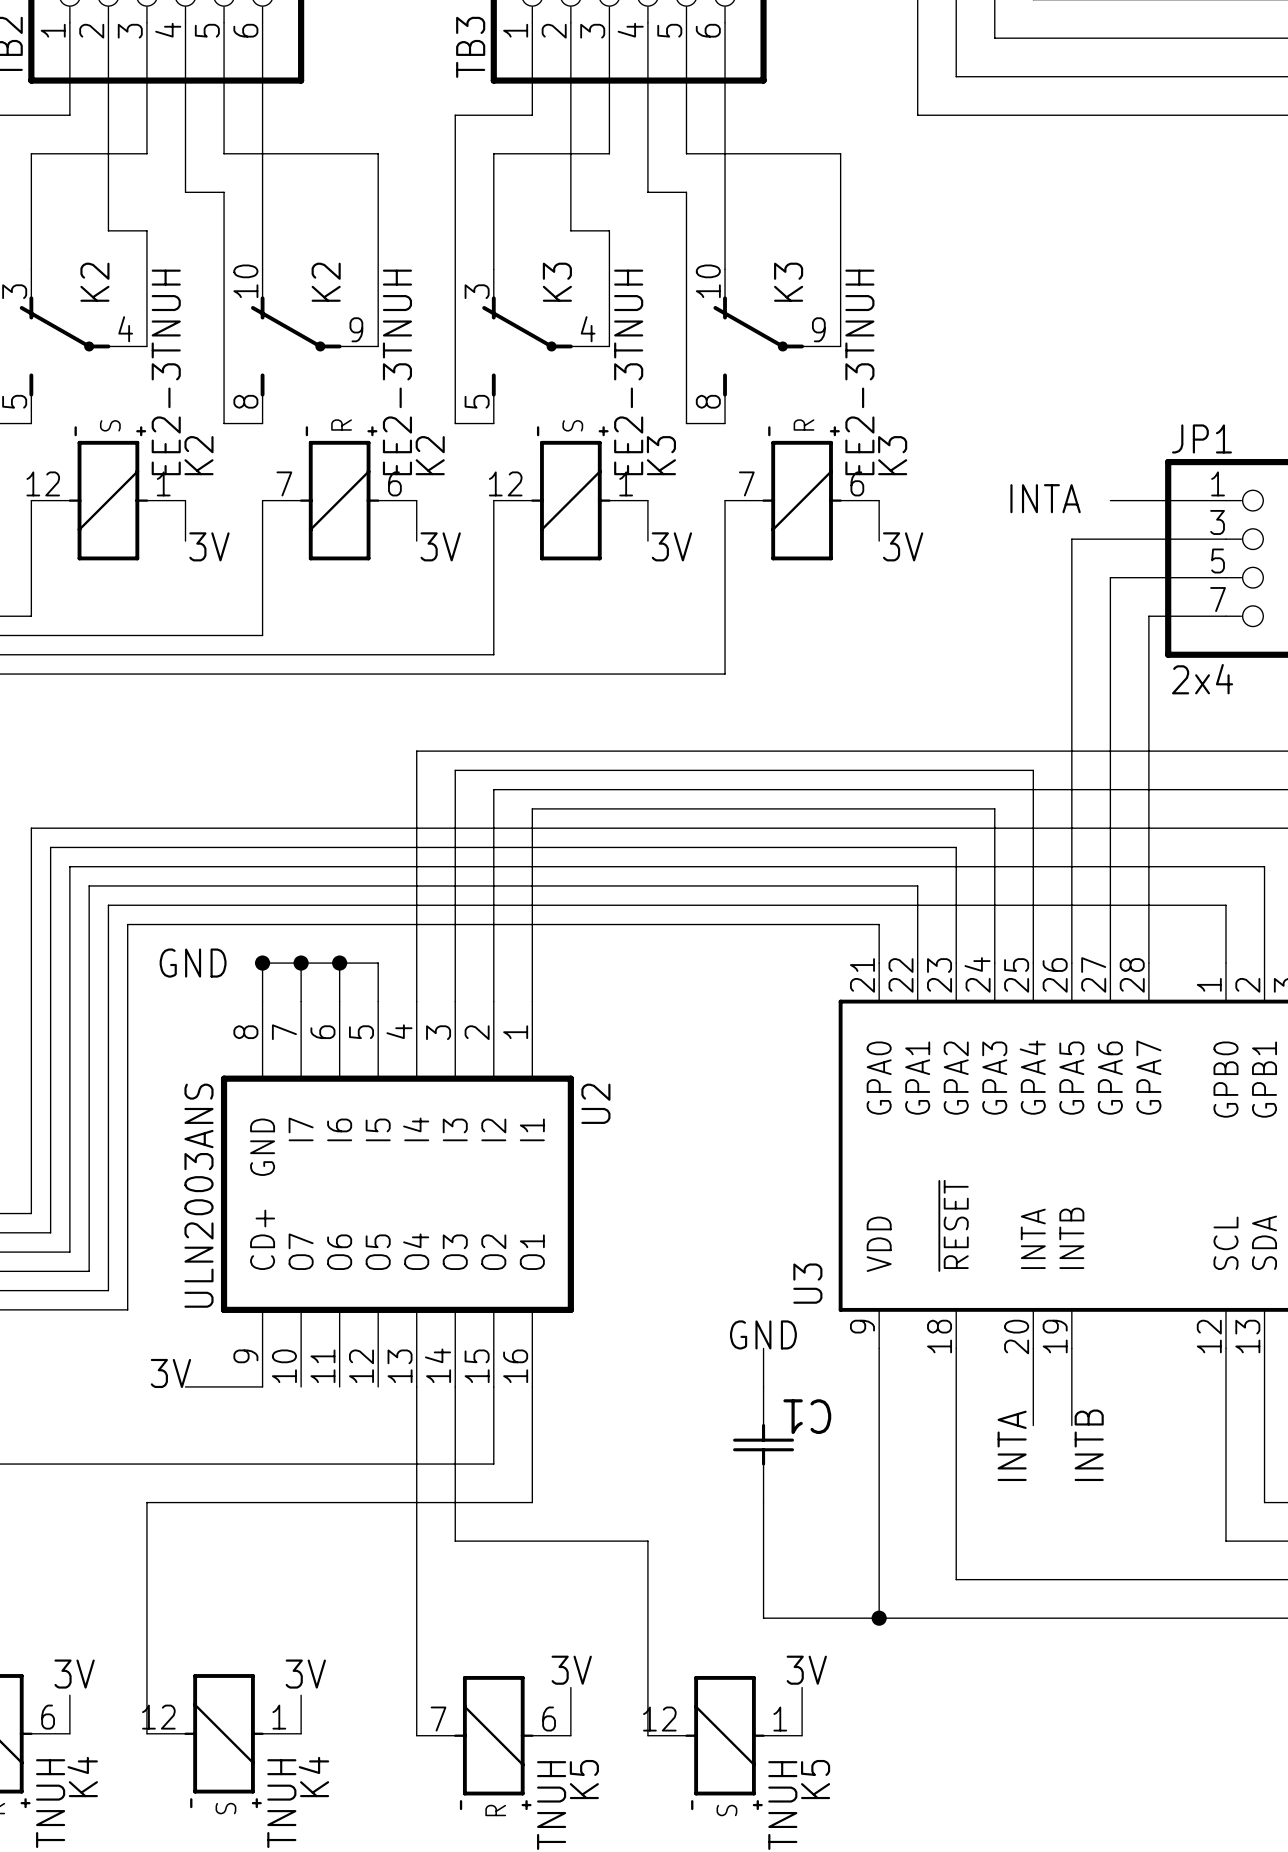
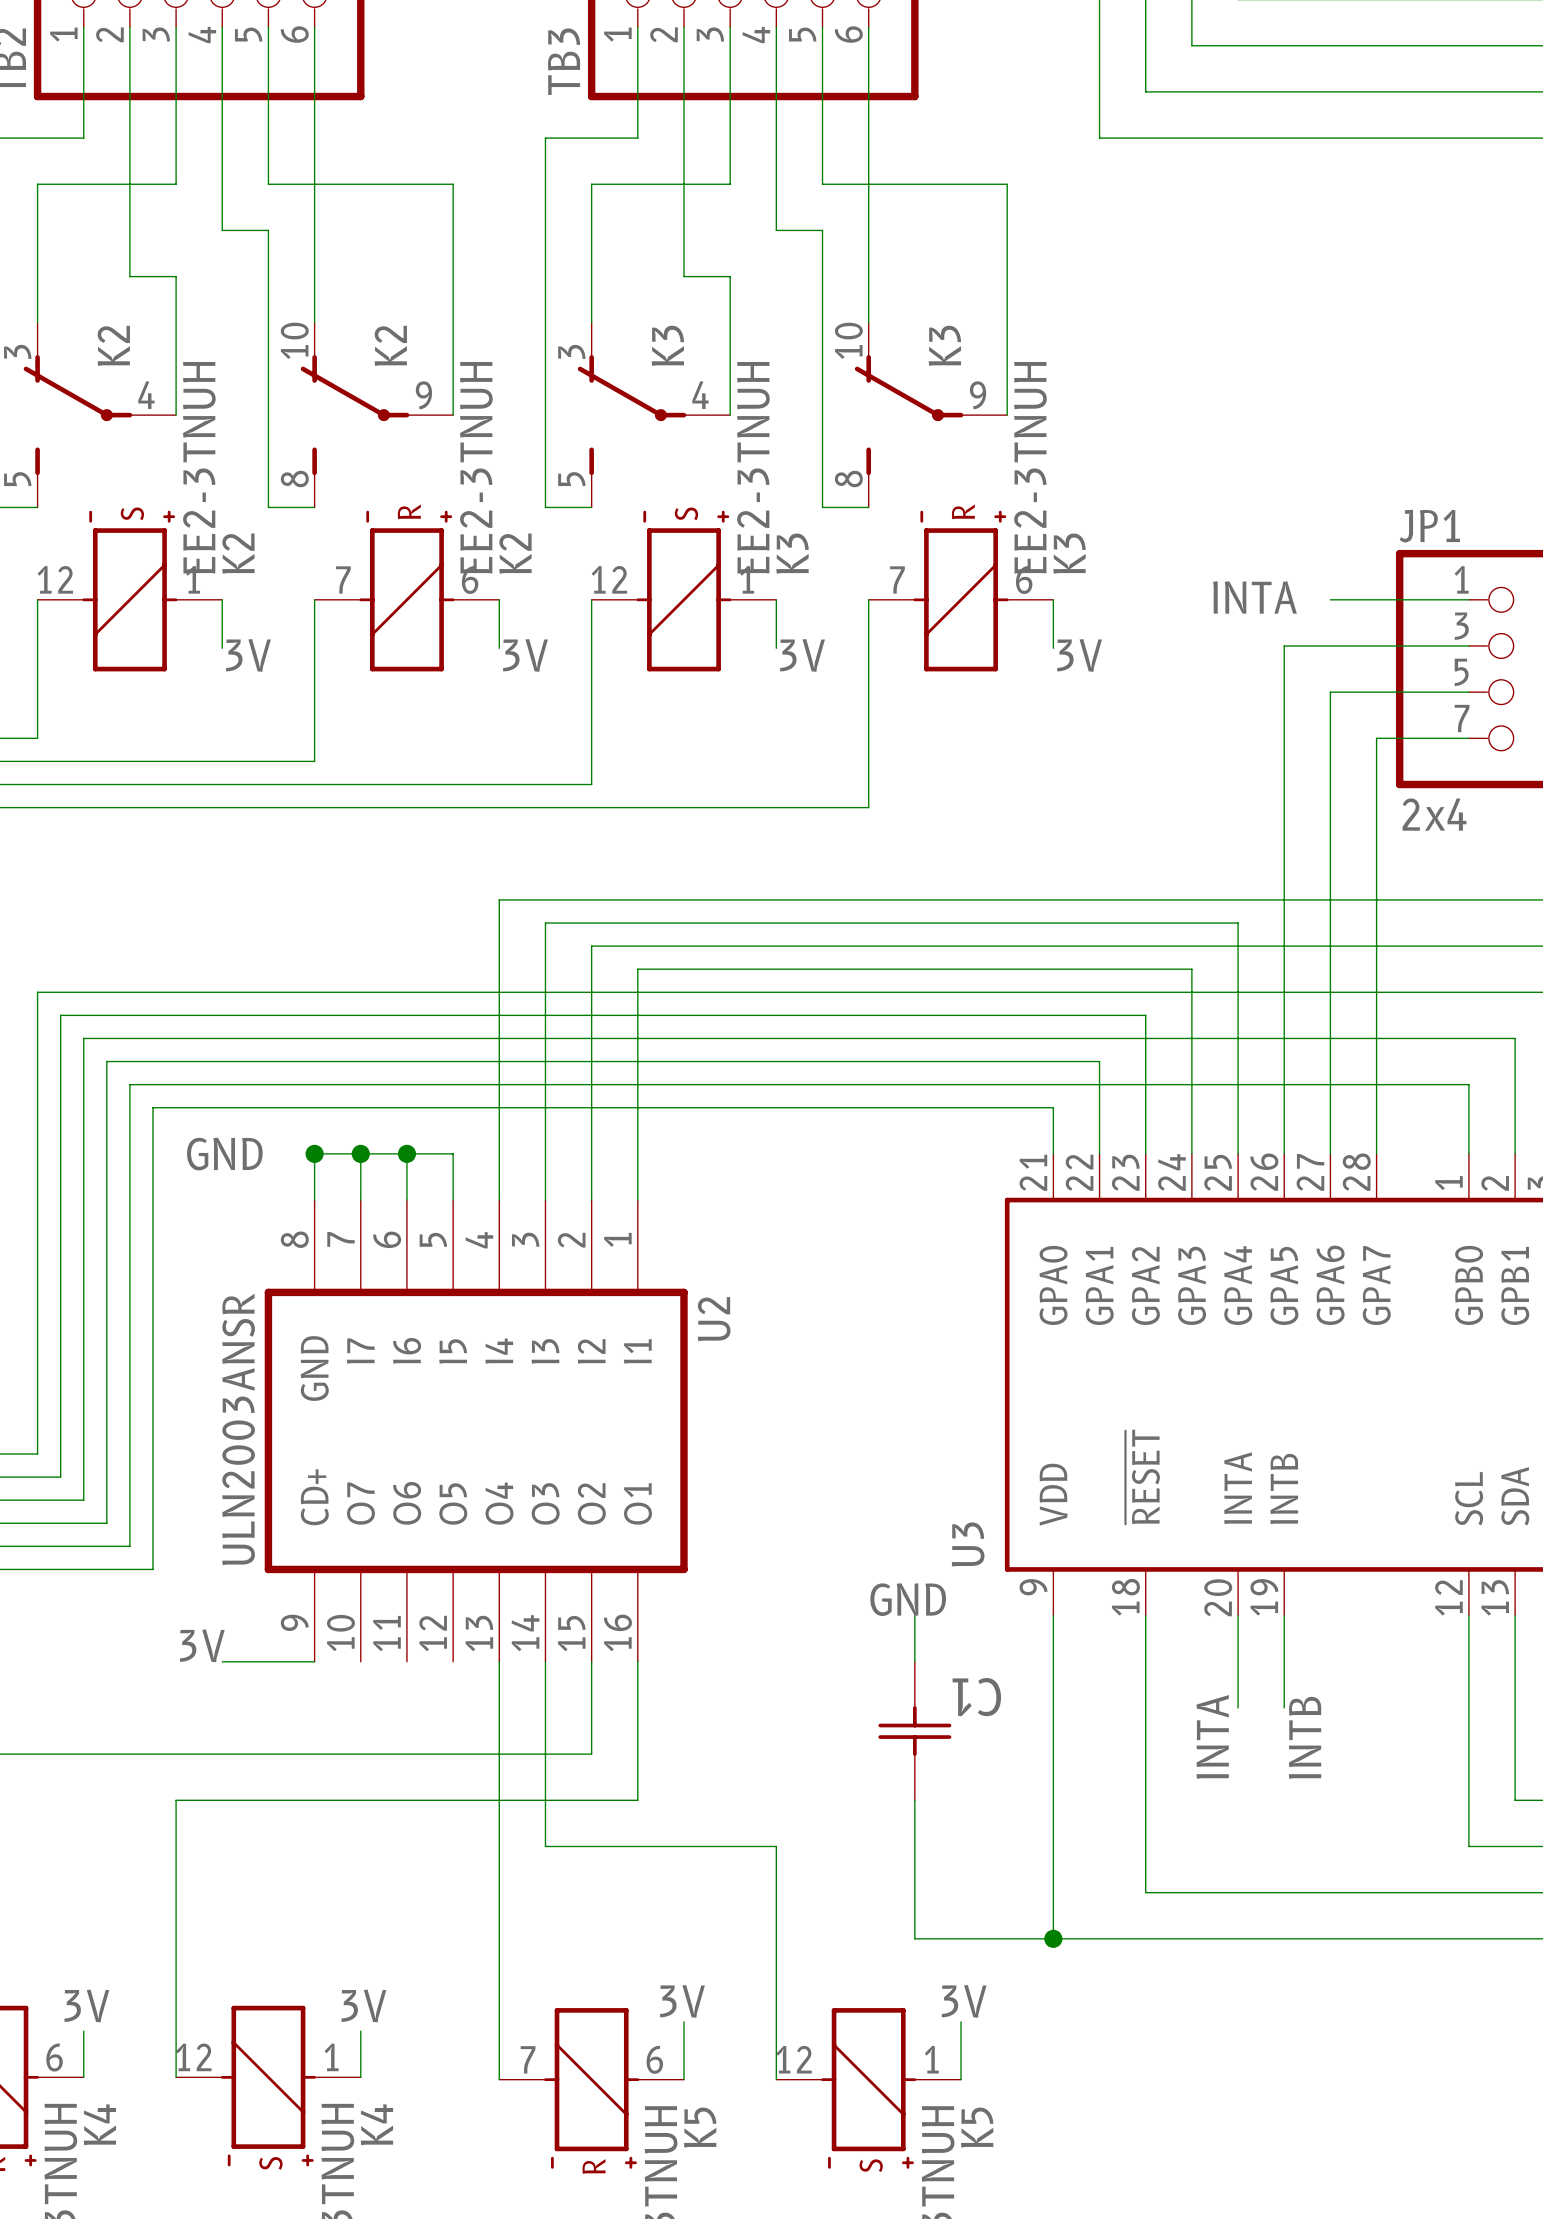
U2 value: ULN2003ANS (198, 1195) -> ULN2003ANSR (238, 1429)

